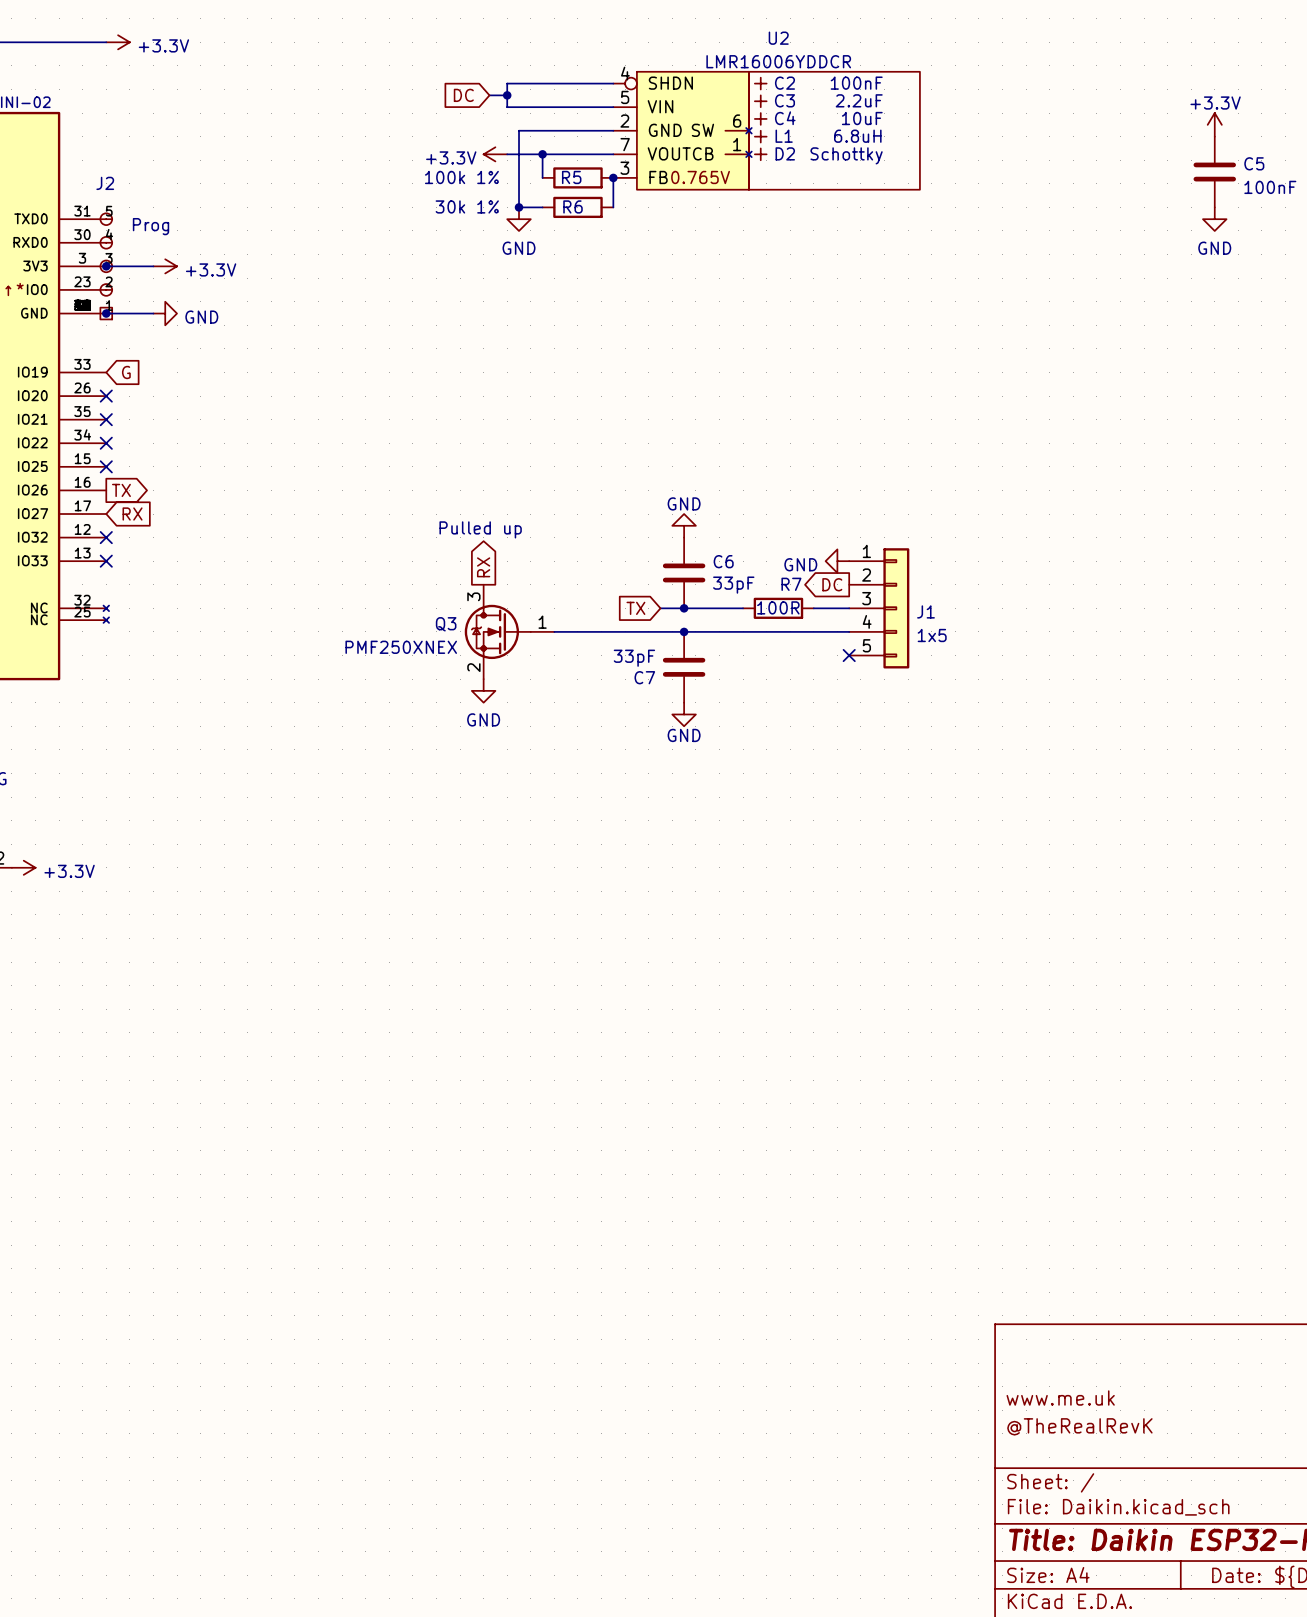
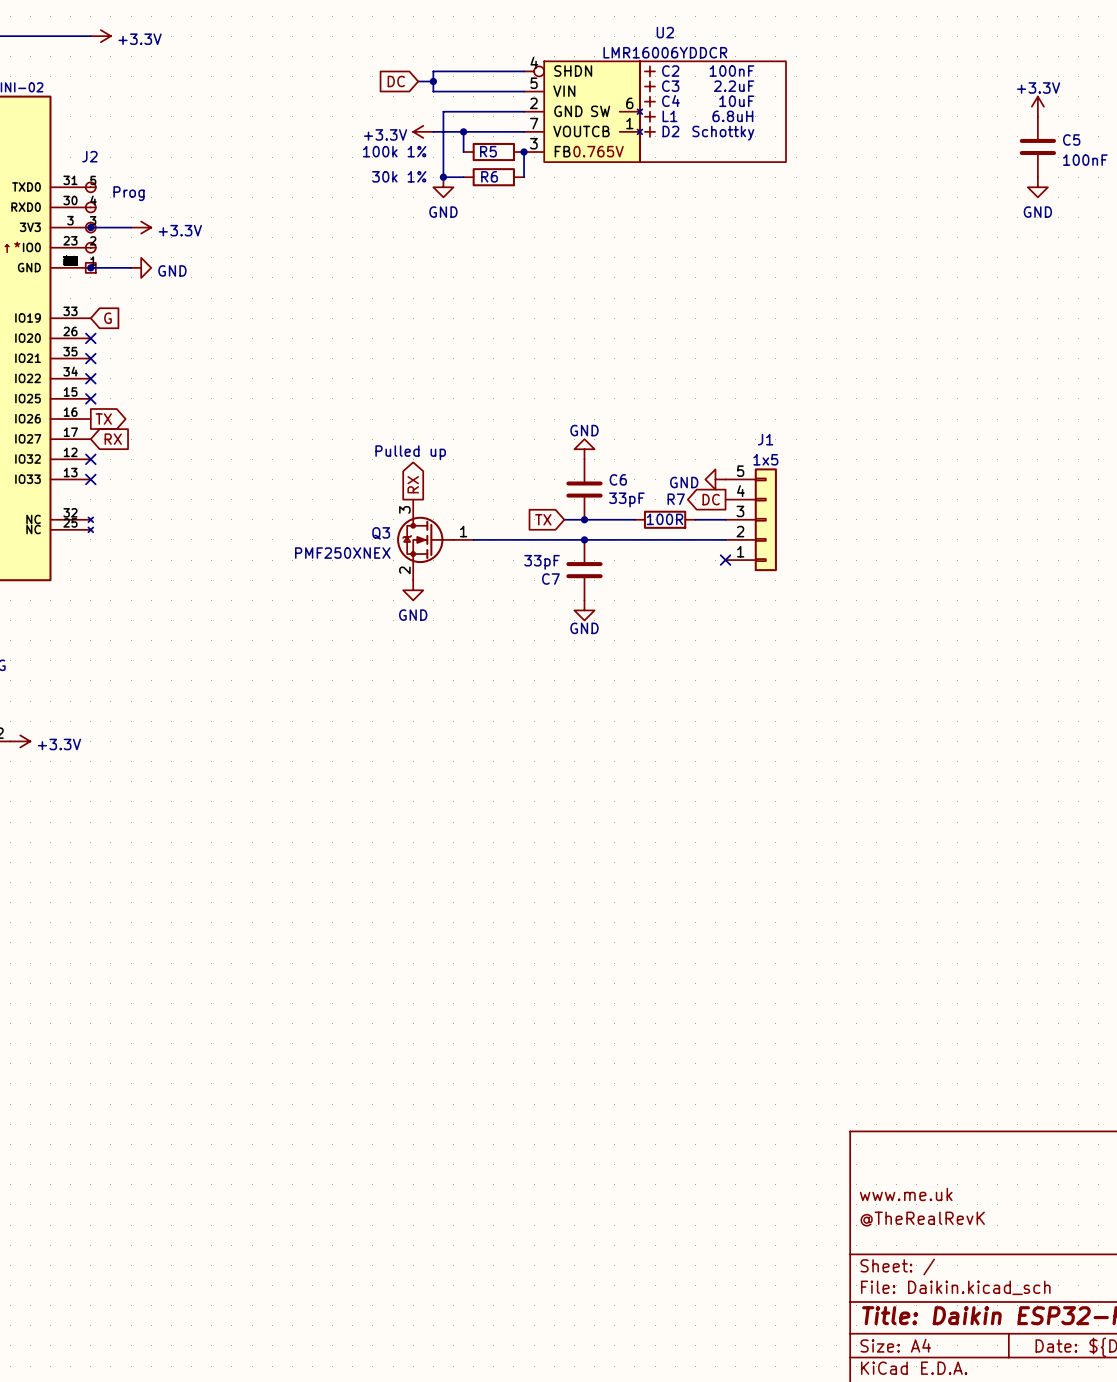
J1 flip: as is (896, 608) -> up-down (765, 519)
J1 name position: J1 (925, 611) -> J1 (765, 439)
J1 value position: 1x5 (932, 635) -> 1x5 (765, 459)

